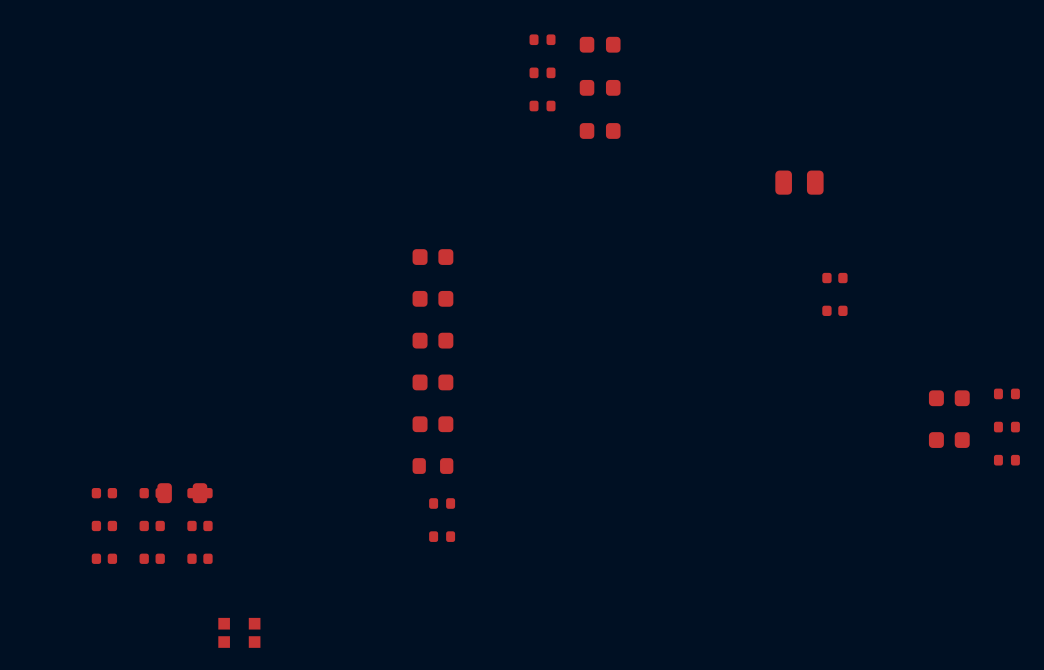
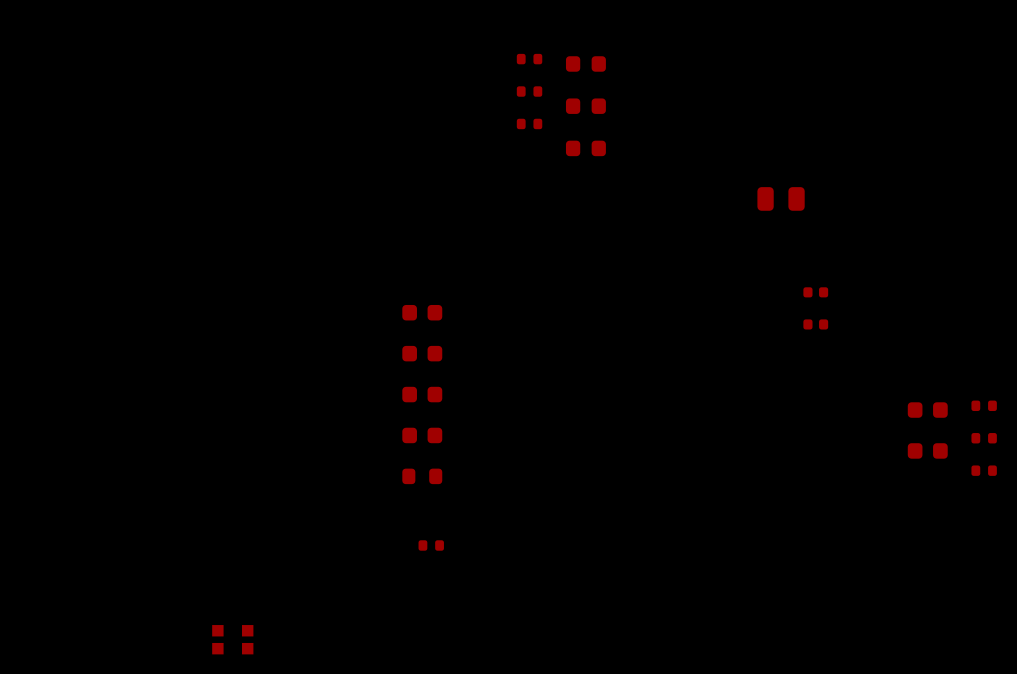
part: (432, 257) -> none
part: (104, 493) -> none
part: (152, 493) -> none
part: (182, 493) -> none
part: (199, 493) -> none
part: (442, 503) -> none
part: (104, 525) -> none
part: (152, 525) -> none
part: (199, 525) -> none
part: (104, 558) -> none
part: (152, 558) -> none
part: (199, 558) -> none

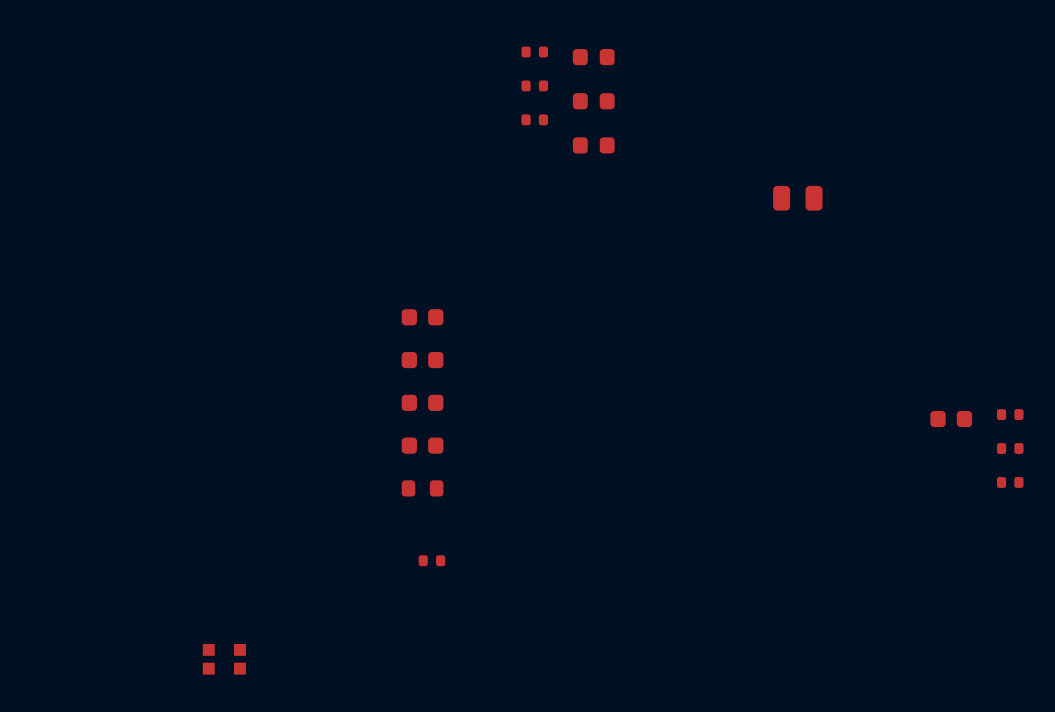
part: (815, 292) -> none
part: (815, 324) -> none
part: (927, 450) -> none

